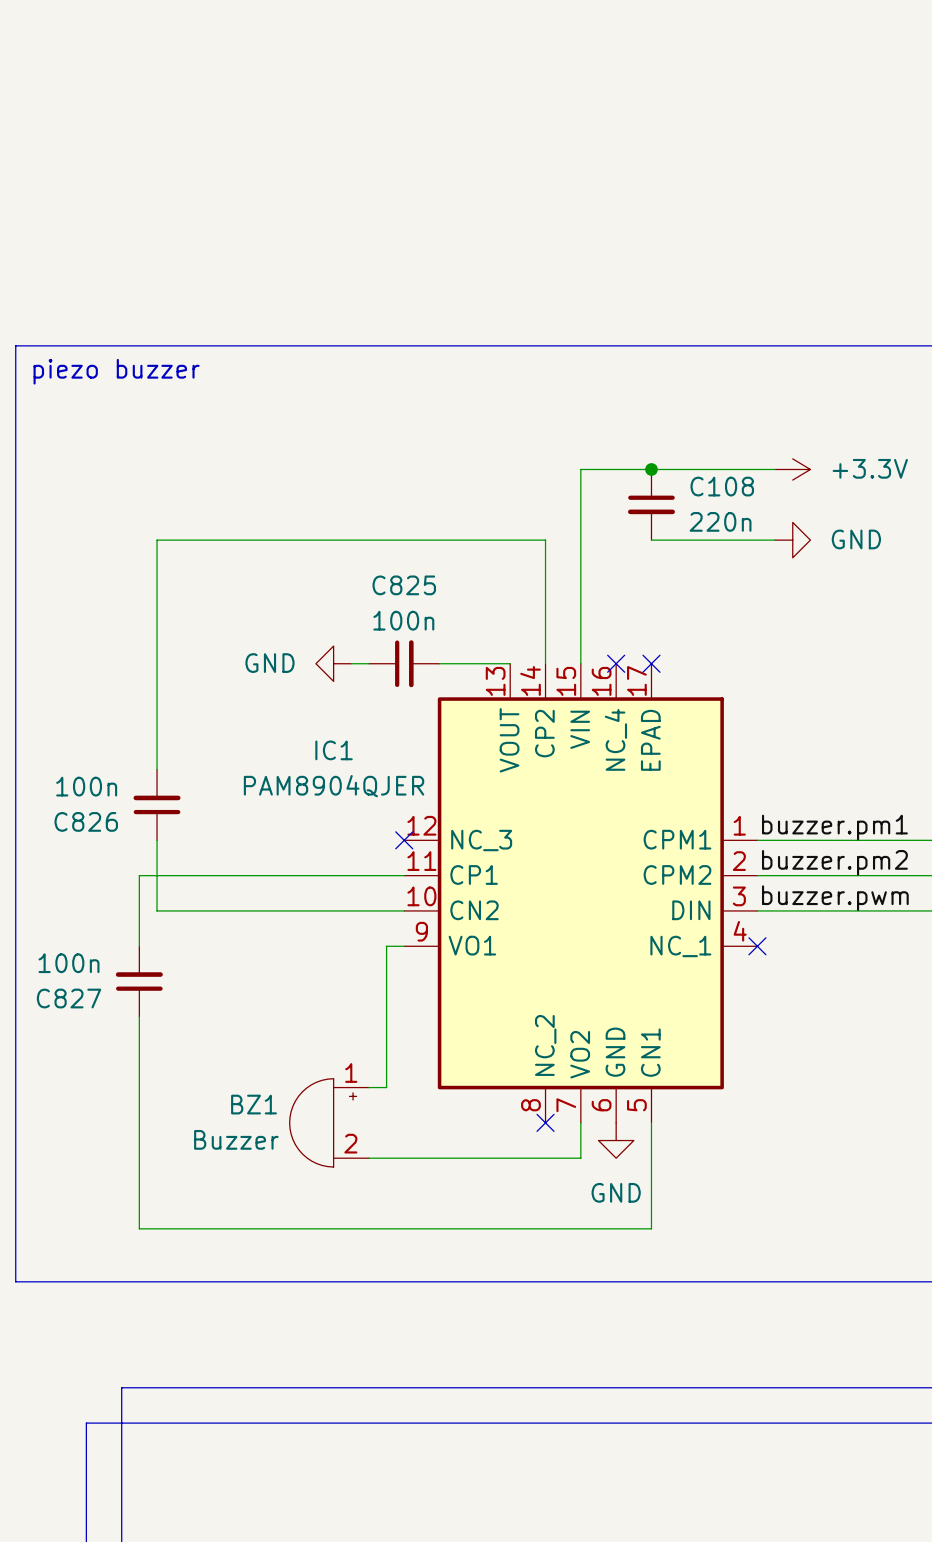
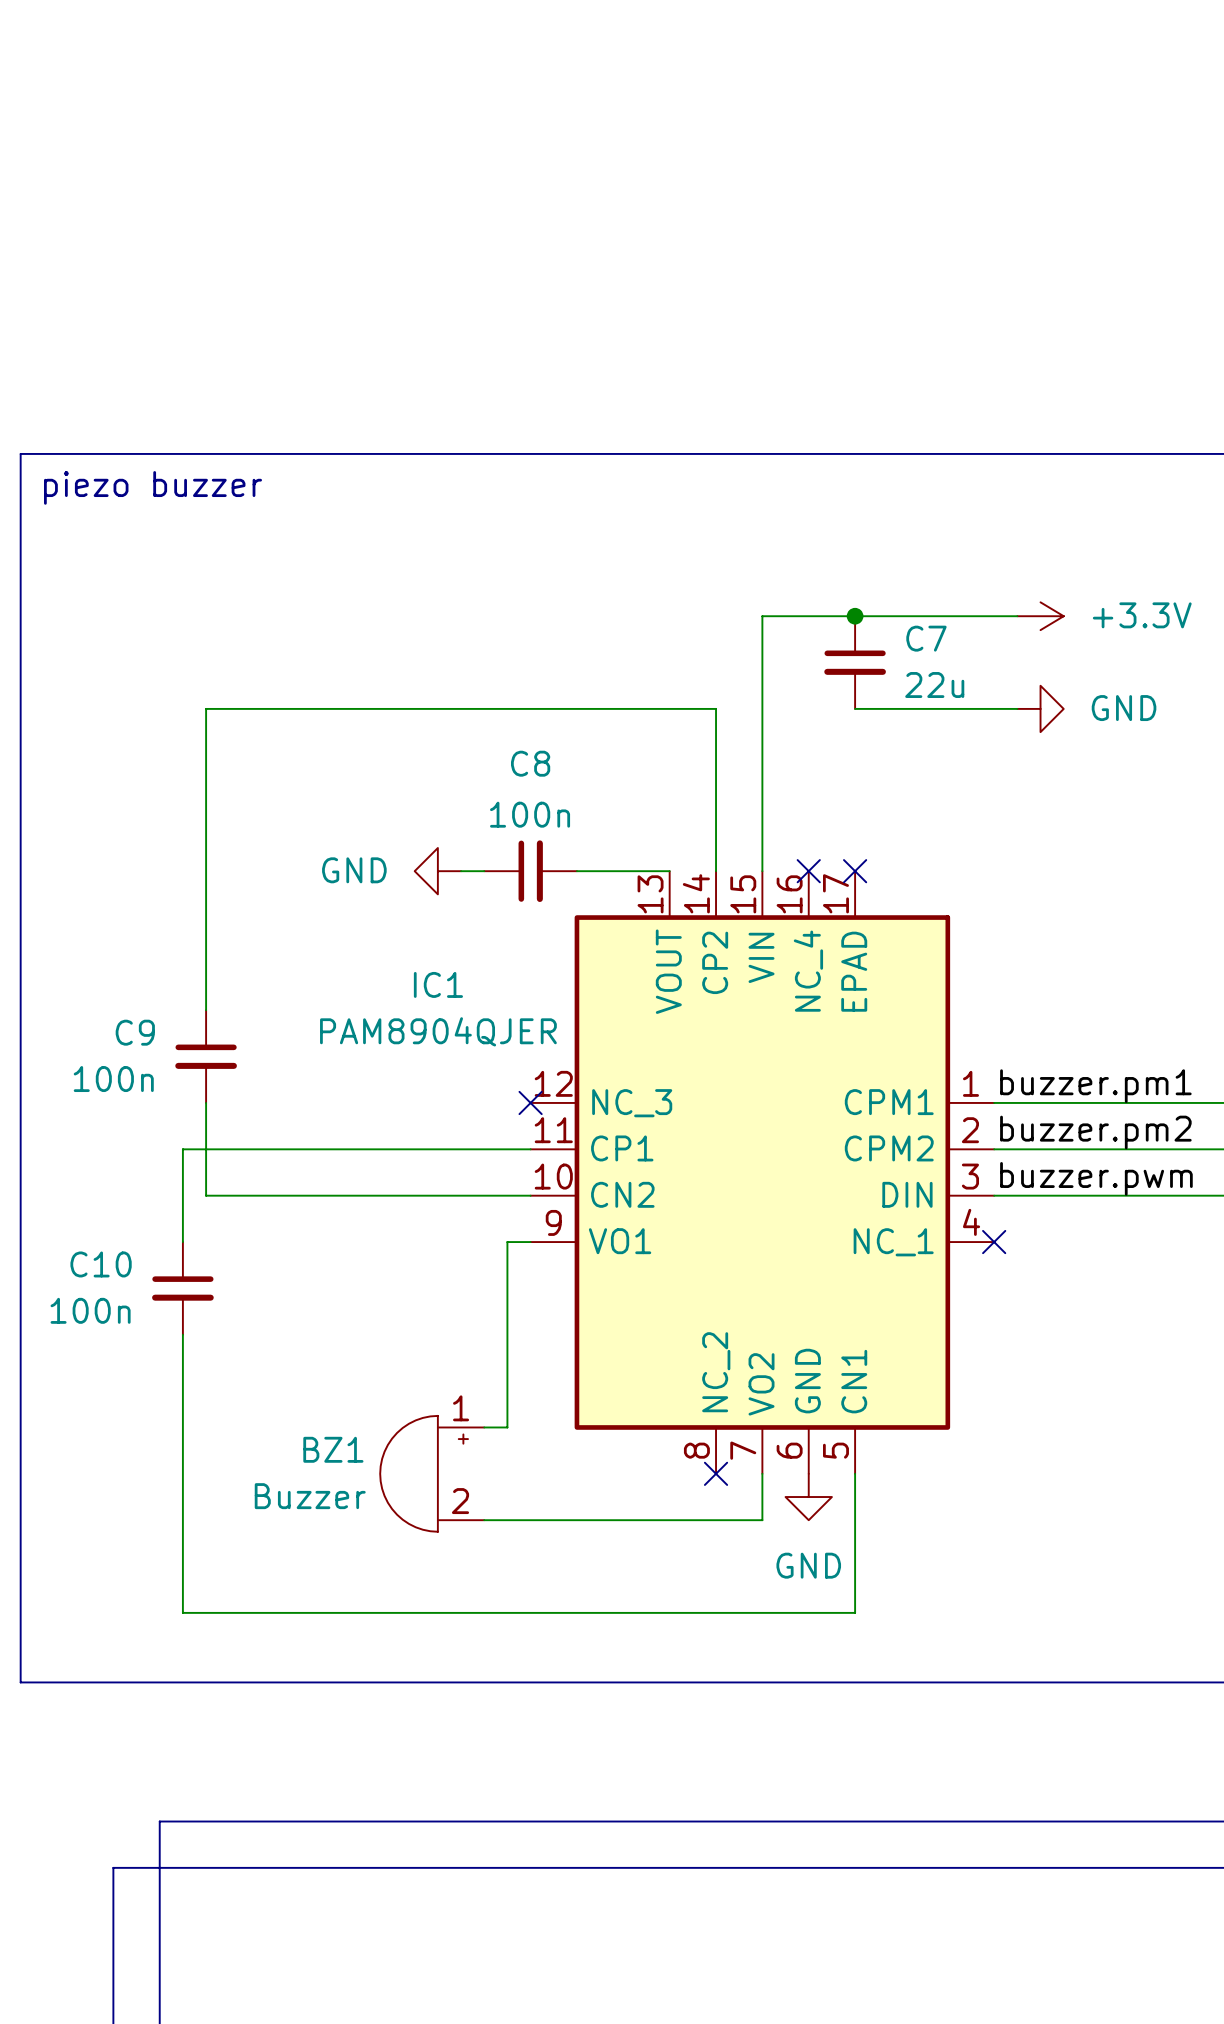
C108 name: C108 (722, 486) -> C7 (926, 638)
C108 value: 220n (720, 521) -> 22u (934, 685)
C825 name: C825 (404, 585) -> C8 (530, 763)
C826: 100n (157, 805) -> none
C9: none -> 100n (206, 1056)
C827: 100n (139, 981) -> none
C10: none -> 100n (182, 1288)

